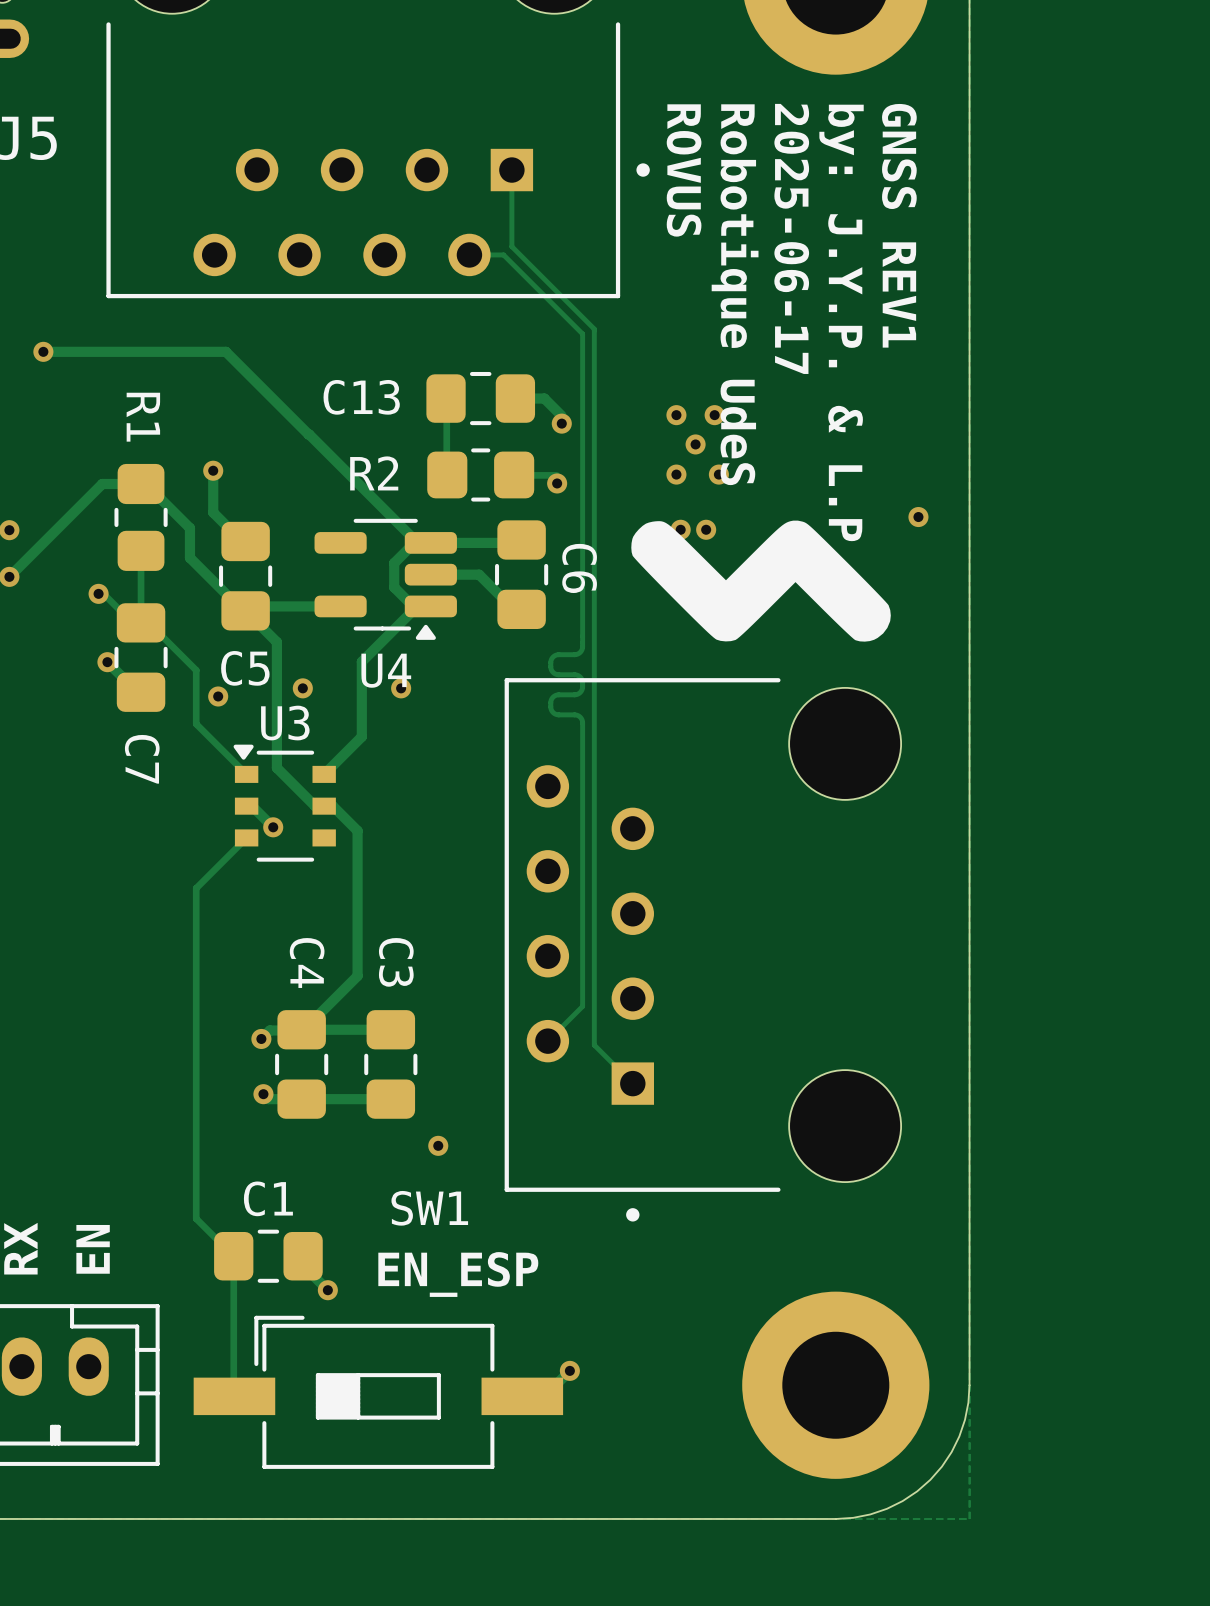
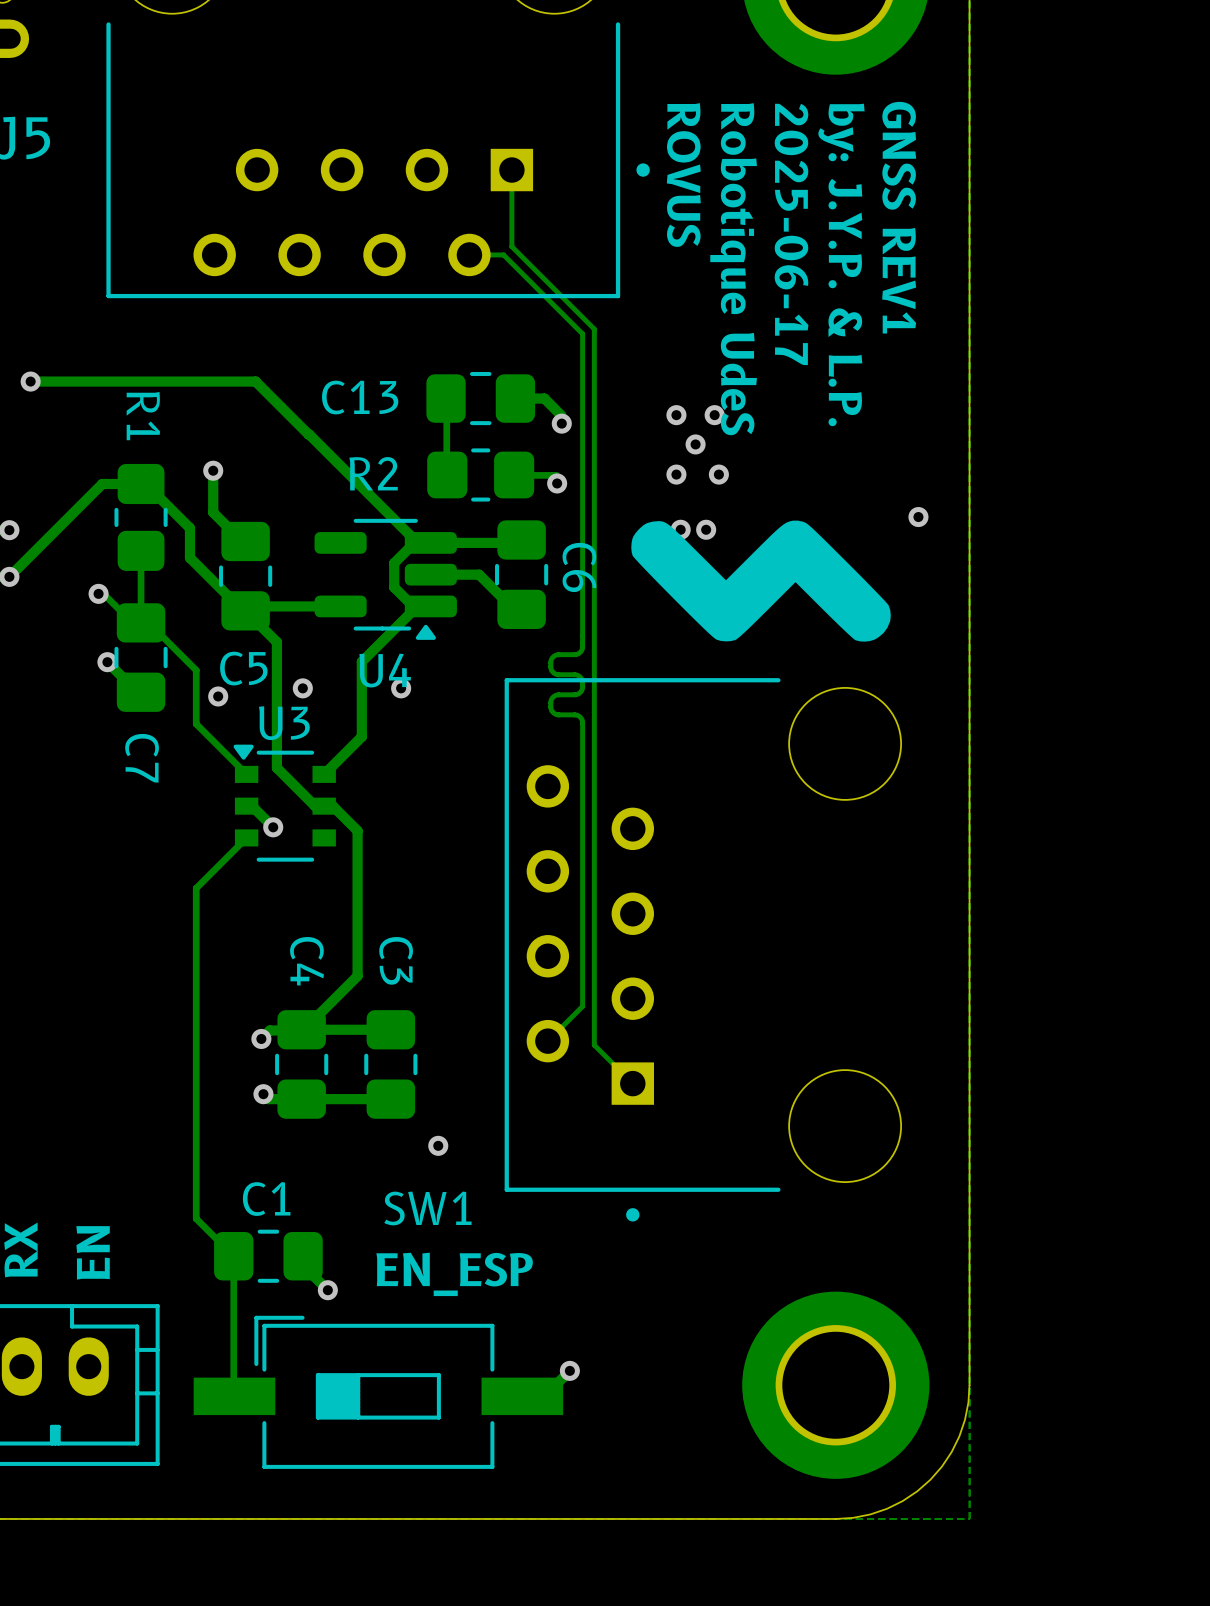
track: (43, 351) (225, 351) (255, 381) -> (30, 381) (255, 381)
via position: (43, 351) -> (30, 381)

